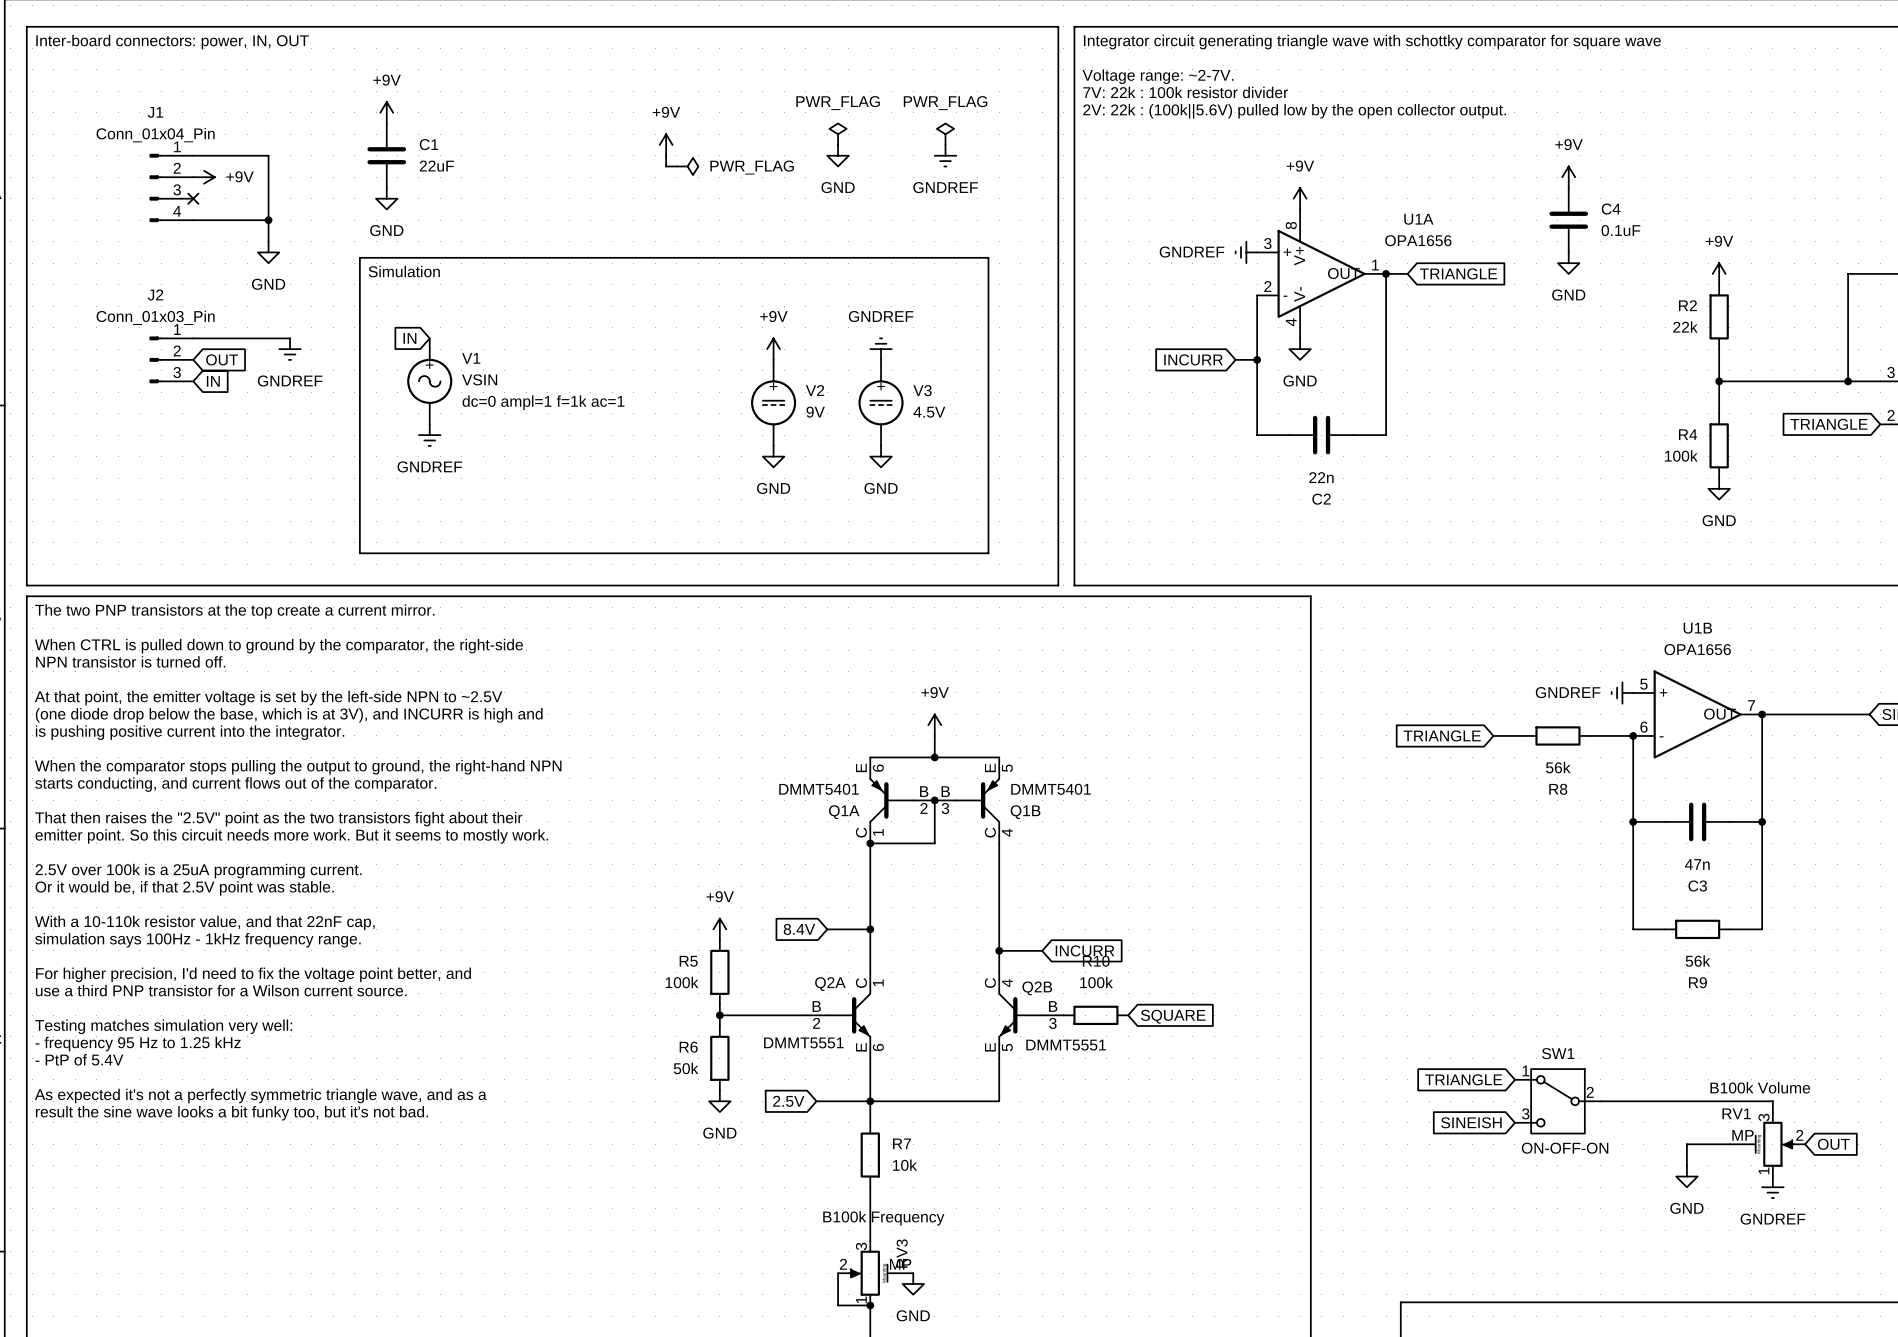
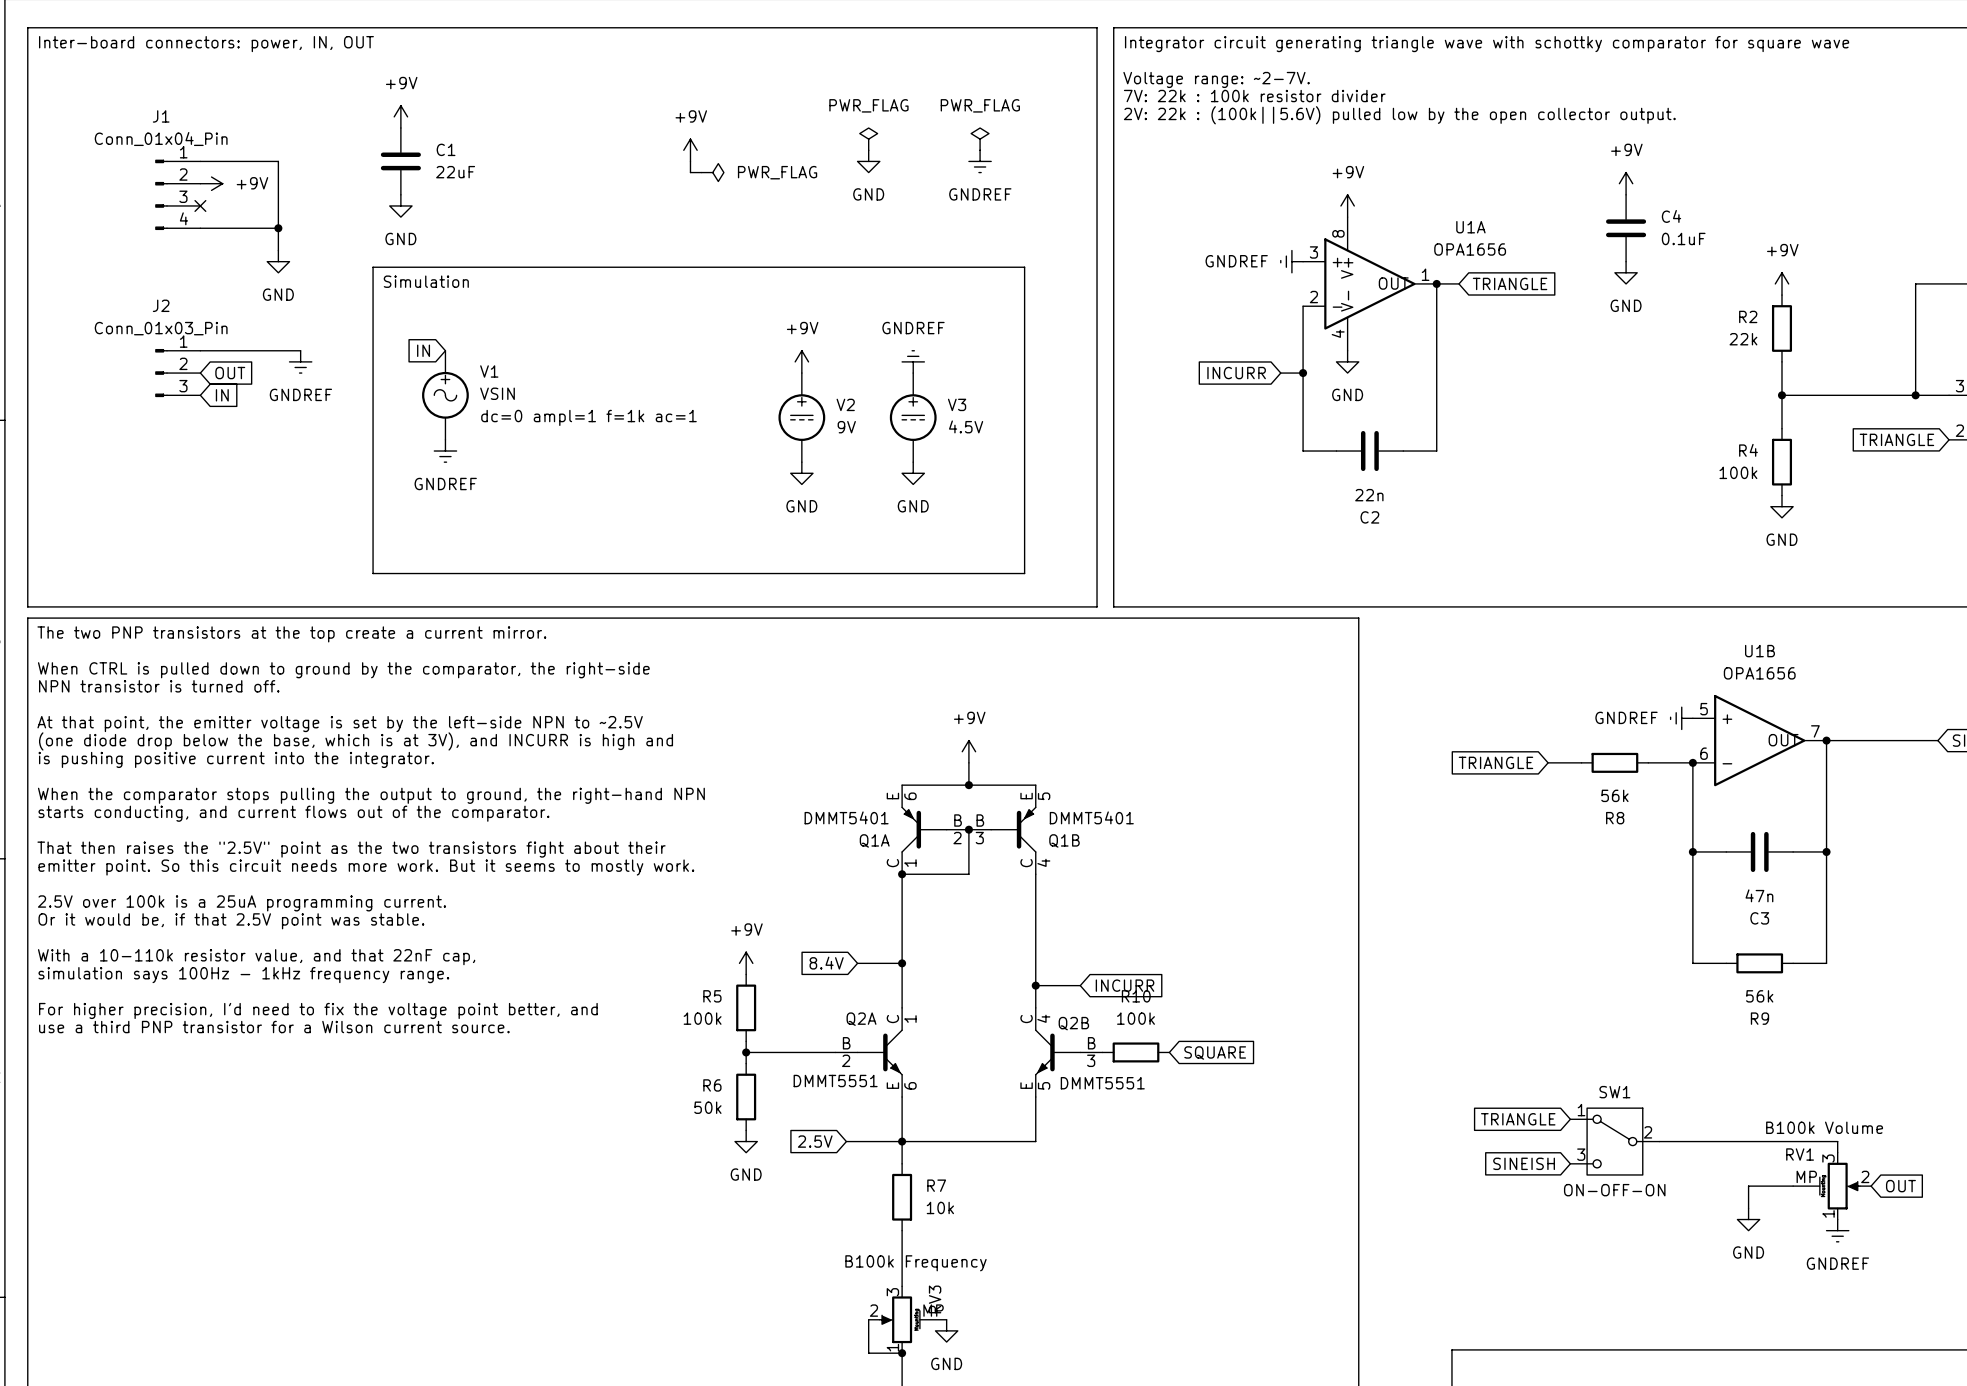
text: Testing matches simulation very well: (163, 1026) -> none
text: - frequency 95 Hz to 1.25 kHz (138, 1044) -> none
text: - PtP of 5.4V (79, 1059) -> none
text: As expected it's not a perfectly symmetric triangle wave, and as a (260, 1095) -> none
text: result the sine wave looks a bit funky too, but it's not bad. (231, 1113) -> none

